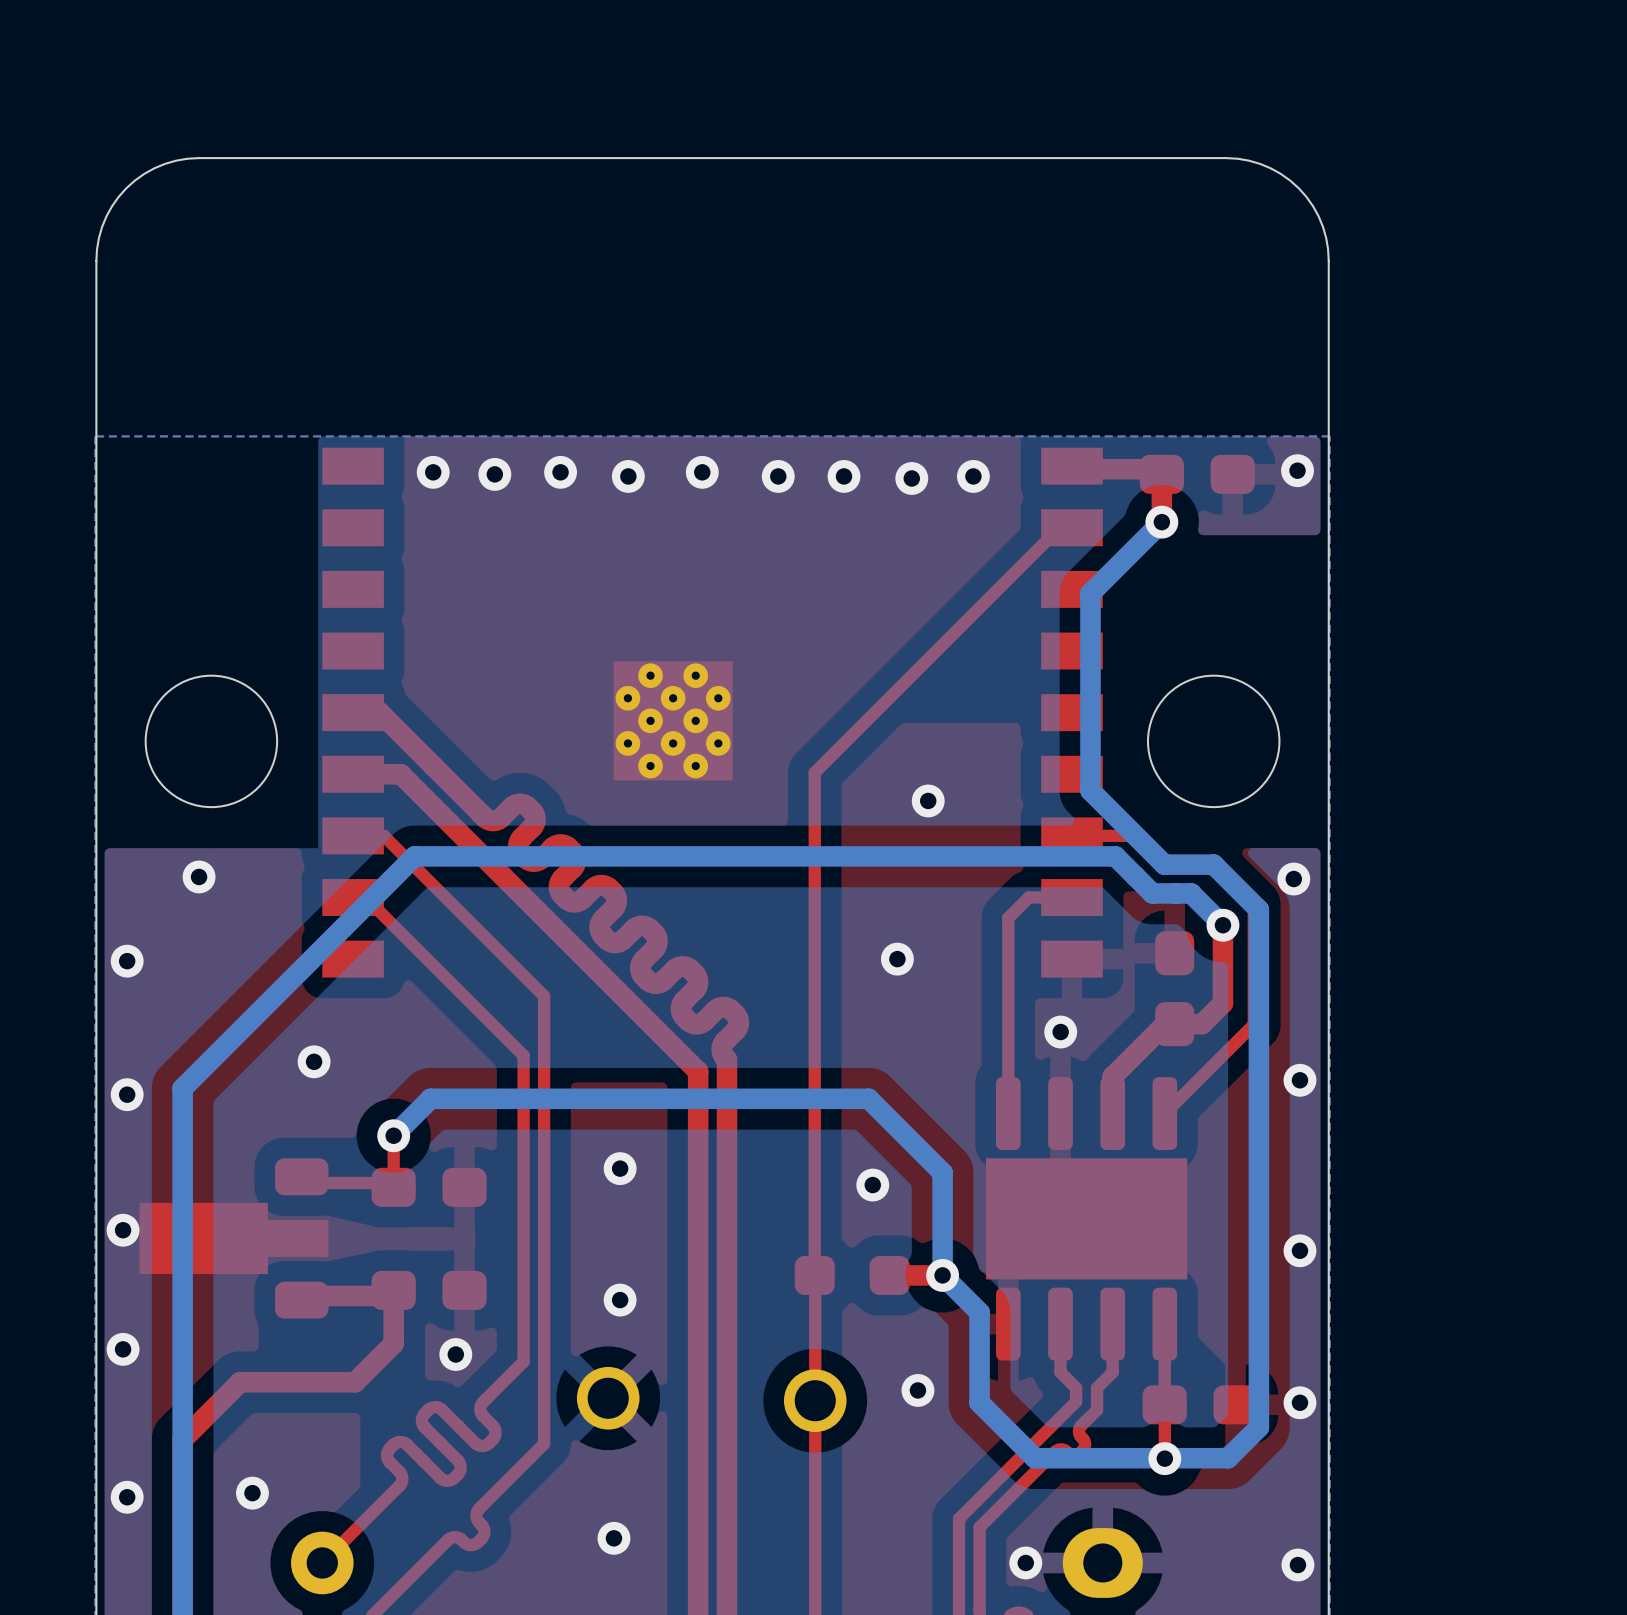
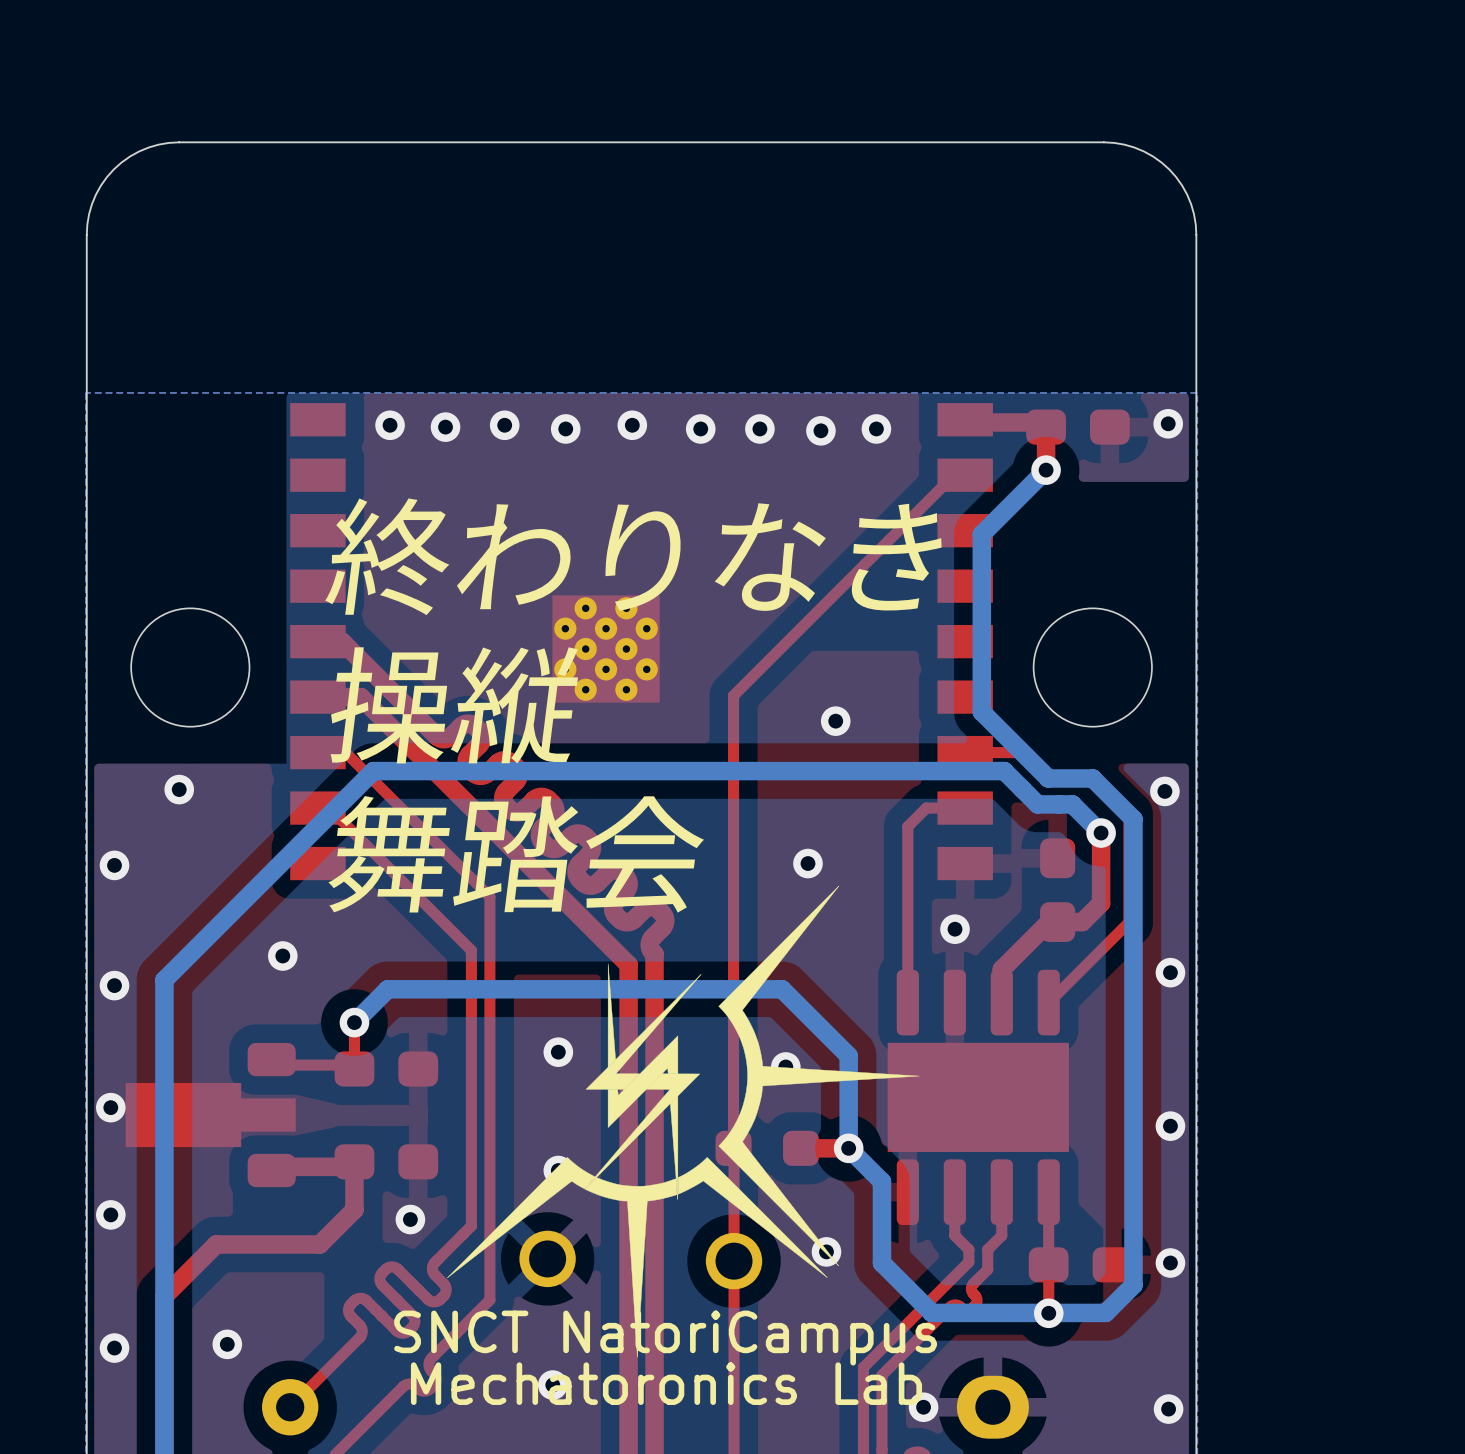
text: none -> 終わりなき (633, 556)
text: none -> 操縦 (454, 705)
text: none -> 舞踏会 (516, 854)
drawing: none -> [447, 885, 920, 1358]

